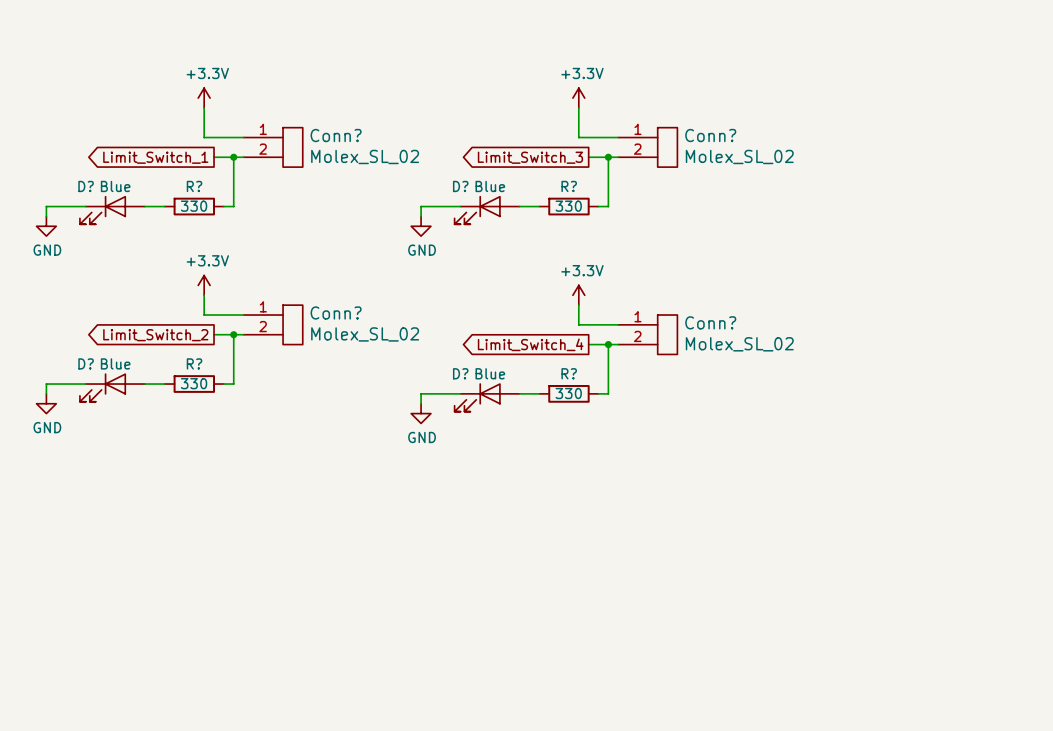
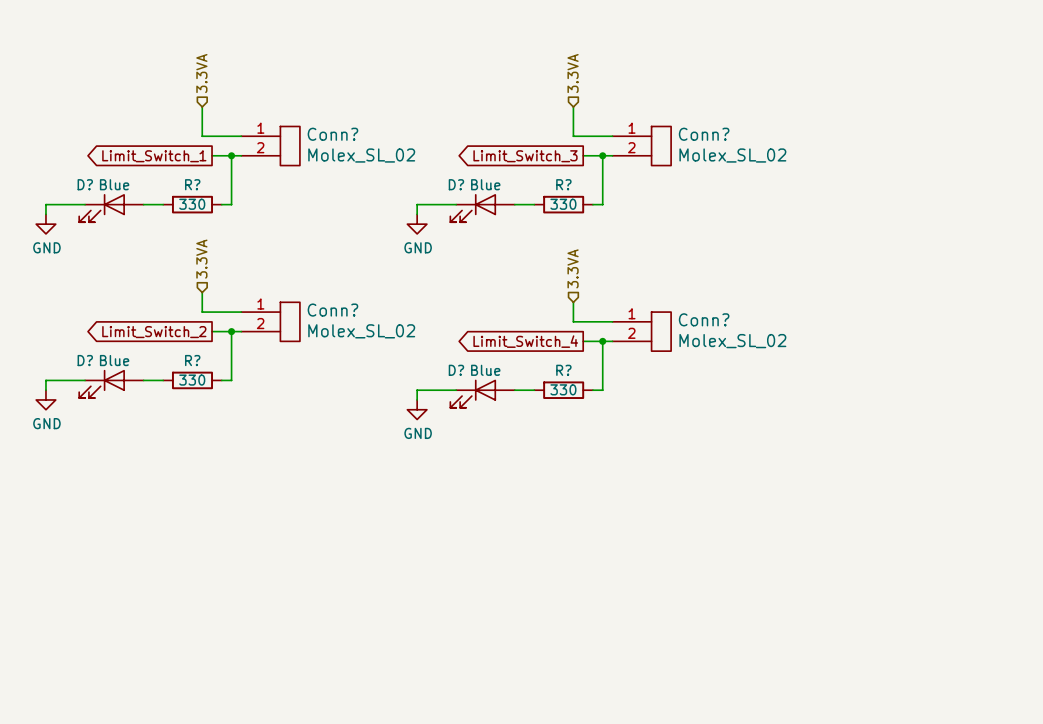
hierarchical label: none -> 3.3VA (201, 73)
hierarchical label: none -> 3.3VA (573, 73)
power symbol: +3.3V (204, 98) -> none
power symbol: +3.3V (578, 98) -> none
hierarchical label: none -> 3.3VA (201, 259)
hierarchical label: none -> 3.3VA (573, 268)
power symbol: +3.3V (204, 285) -> none
power symbol: +3.3V (578, 295) -> none

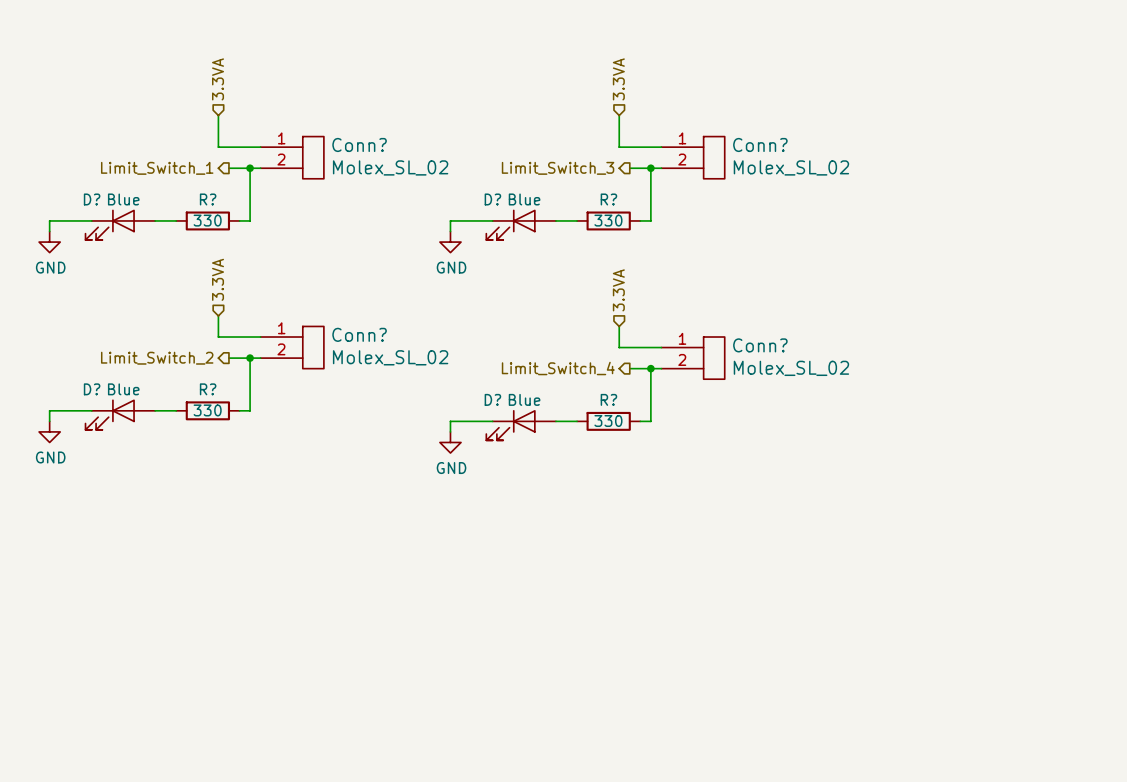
hierarchical label: none -> Limit_Switch_1 (157, 168)
hierarchical label: none -> Limit_Switch_3 (558, 168)
global label: Limit_Switch_1 (154, 156) -> none
global label: Limit_Switch_3 (525, 156) -> none
hierarchical label: none -> Limit_Switch_2 (157, 358)
global label: Limit_Switch_2 (154, 332) -> none
hierarchical label: none -> Limit_Switch_4 (558, 368)
global label: Limit_Switch_4 (525, 341) -> none

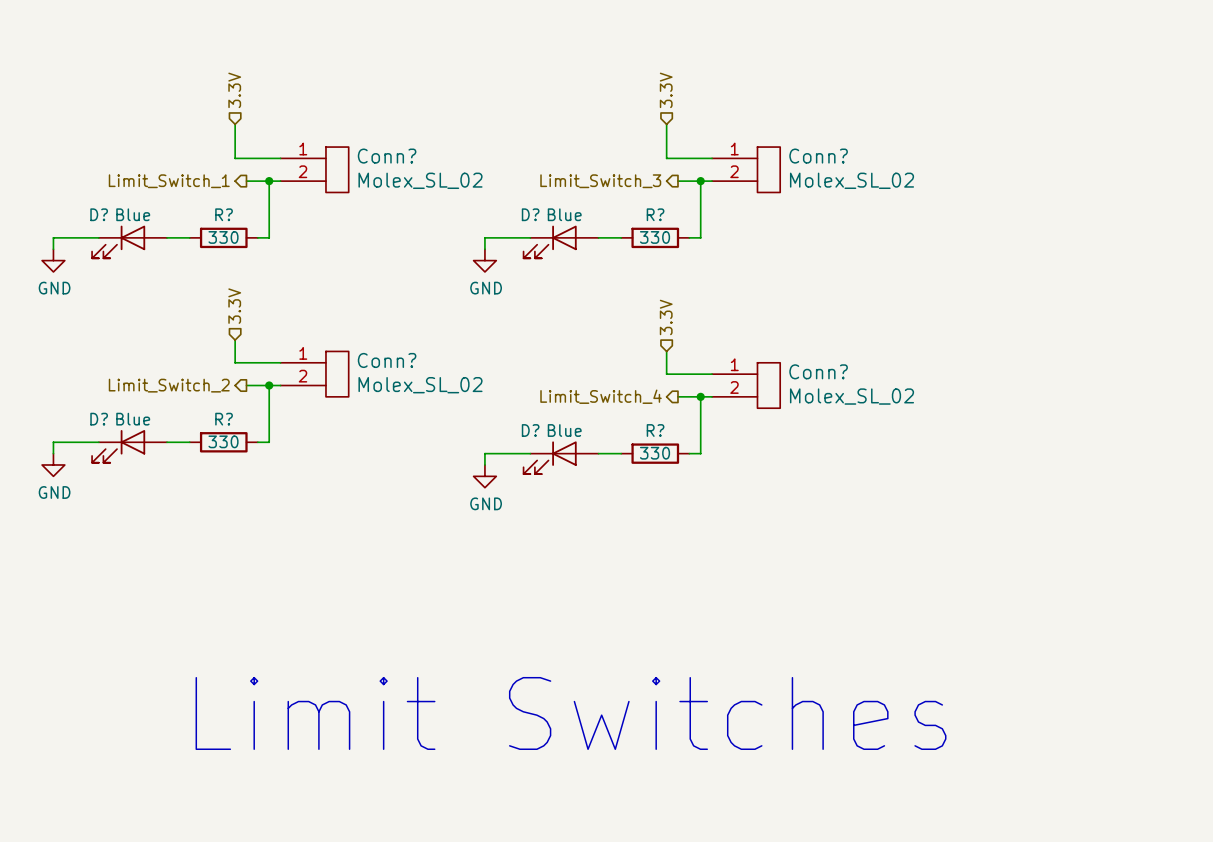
hierarchical label: 3.3VA (218, 79) -> 3.3V (234, 90)
hierarchical label: 3.3VA (618, 79) -> 3.3V (666, 90)
hierarchical label: 3.3VA (218, 279) -> 3.3V (234, 306)
hierarchical label: 3.3VA (618, 290) -> 3.3V (666, 317)
text: none -> Limit Switches (571, 713)

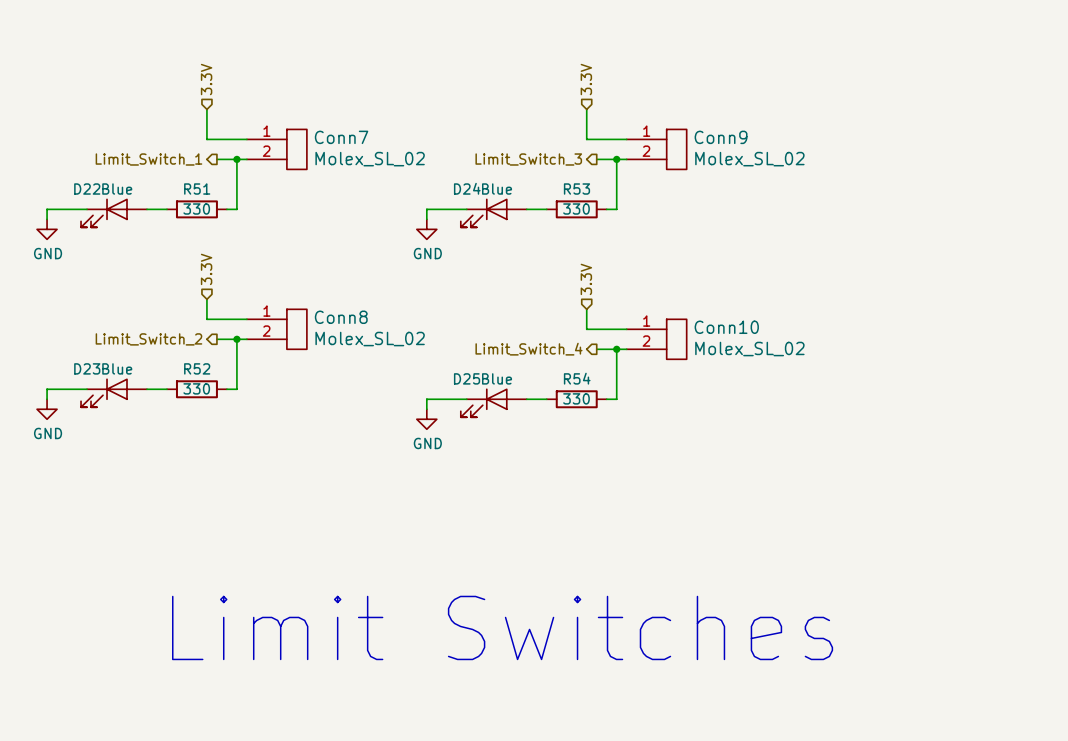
Conn? name: Conn? (387, 156) -> Conn7 (341, 137)
Conn? name: Conn? (818, 156) -> Conn9 (721, 137)
D? name: D? (99, 214) -> D22 (87, 189)
R? name: R? (224, 214) -> R51 (197, 189)
D? name: D? (530, 214) -> D24 (467, 188)
R? name: R? (655, 214) -> R53 (576, 189)
Conn? name: Conn? (387, 360) -> Conn8 (341, 317)
Conn? name: Conn? (818, 371) -> Conn10 (726, 327)
D? name: D? (99, 419) -> D23 (87, 368)
R? name: R? (224, 419) -> R52 (197, 368)
D? name: D? (530, 430) -> D25 (467, 378)
R? name: R? (655, 430) -> R54 (577, 378)

